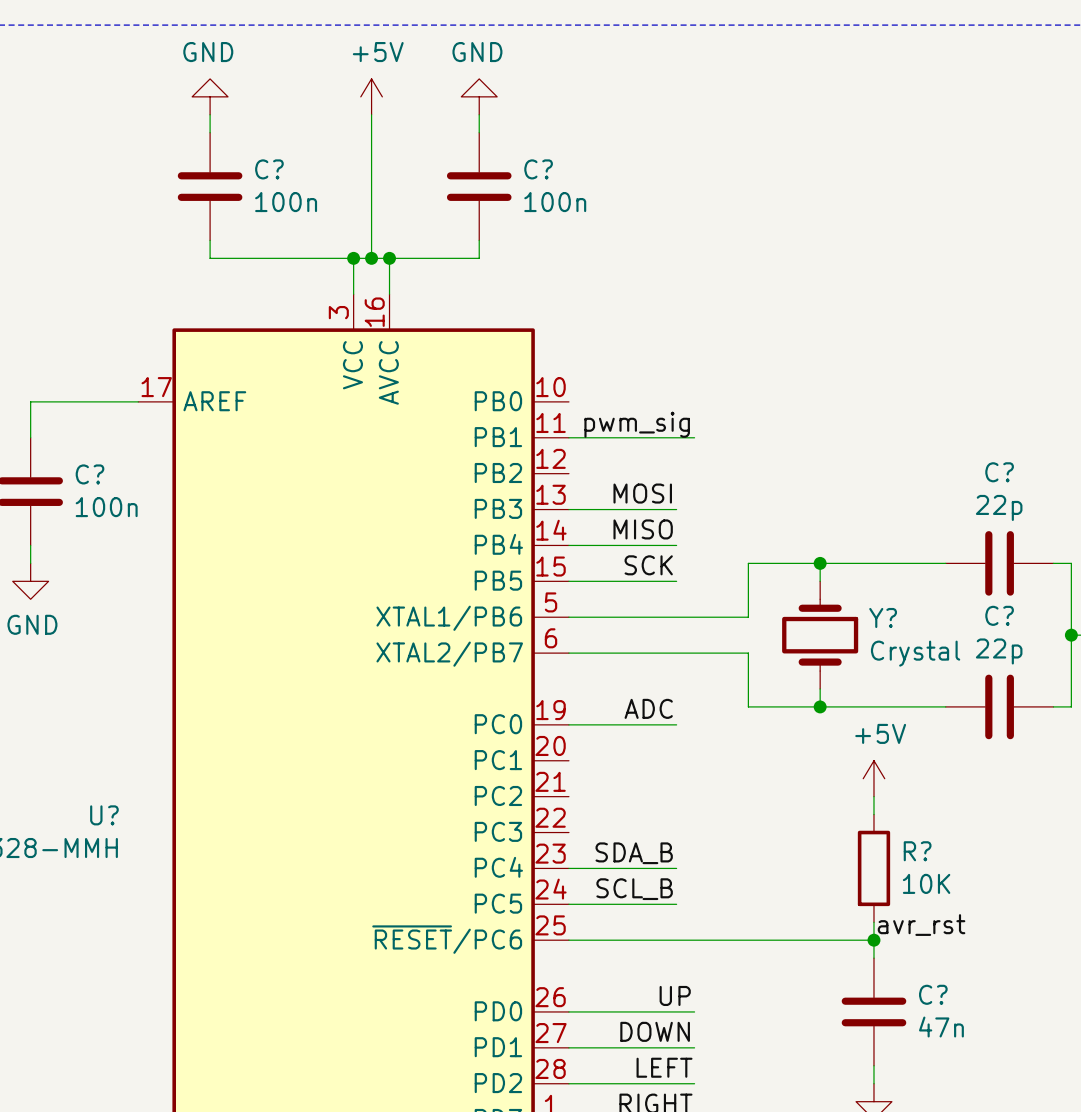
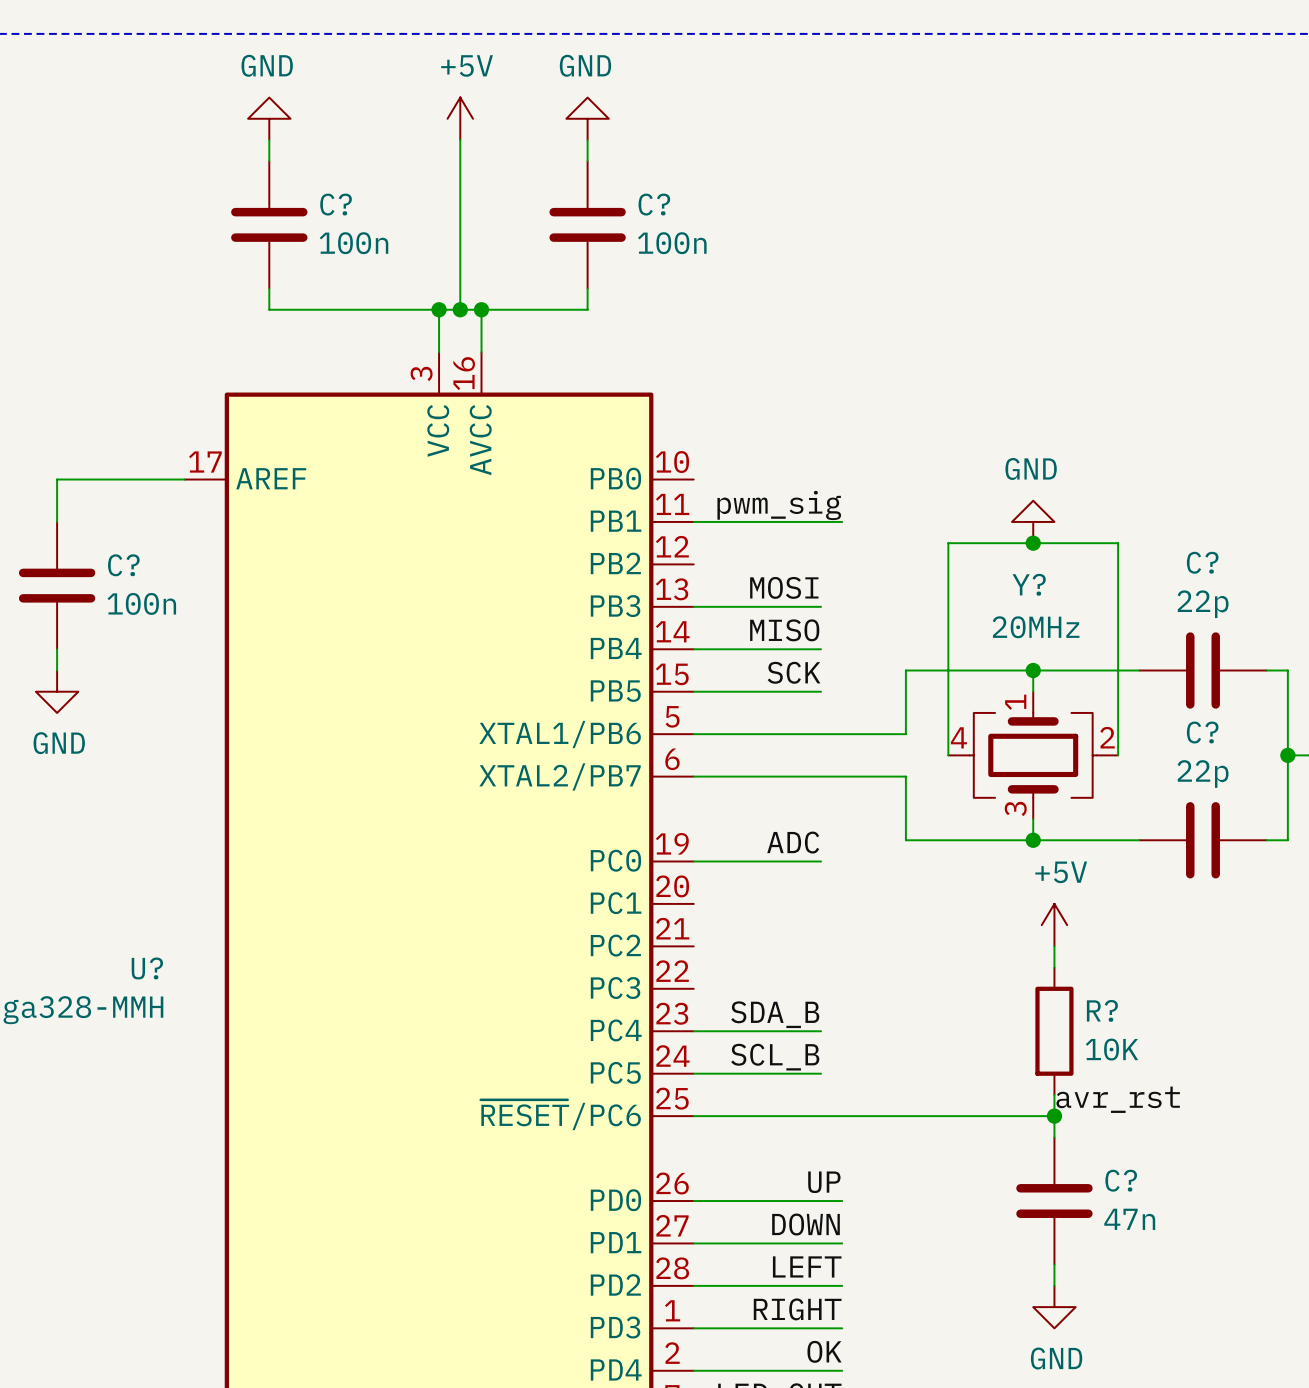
power symbol: none -> GND (1033, 521)
junction: none -> (1033, 543)
wire: (820, 563) (820, 581) -> (1033, 670) (1033, 691)
junction position: (820, 563) -> (1033, 670)
wire: none -> (948, 755) (948, 543) (1118, 543) (1118, 755)
Y?: Crystal (820, 635) -> none
Y?: none -> 20MHz (1033, 755)
wire: (820, 688) (820, 706) -> (1033, 819) (1033, 840)
junction position: (820, 706) -> (1033, 840)

